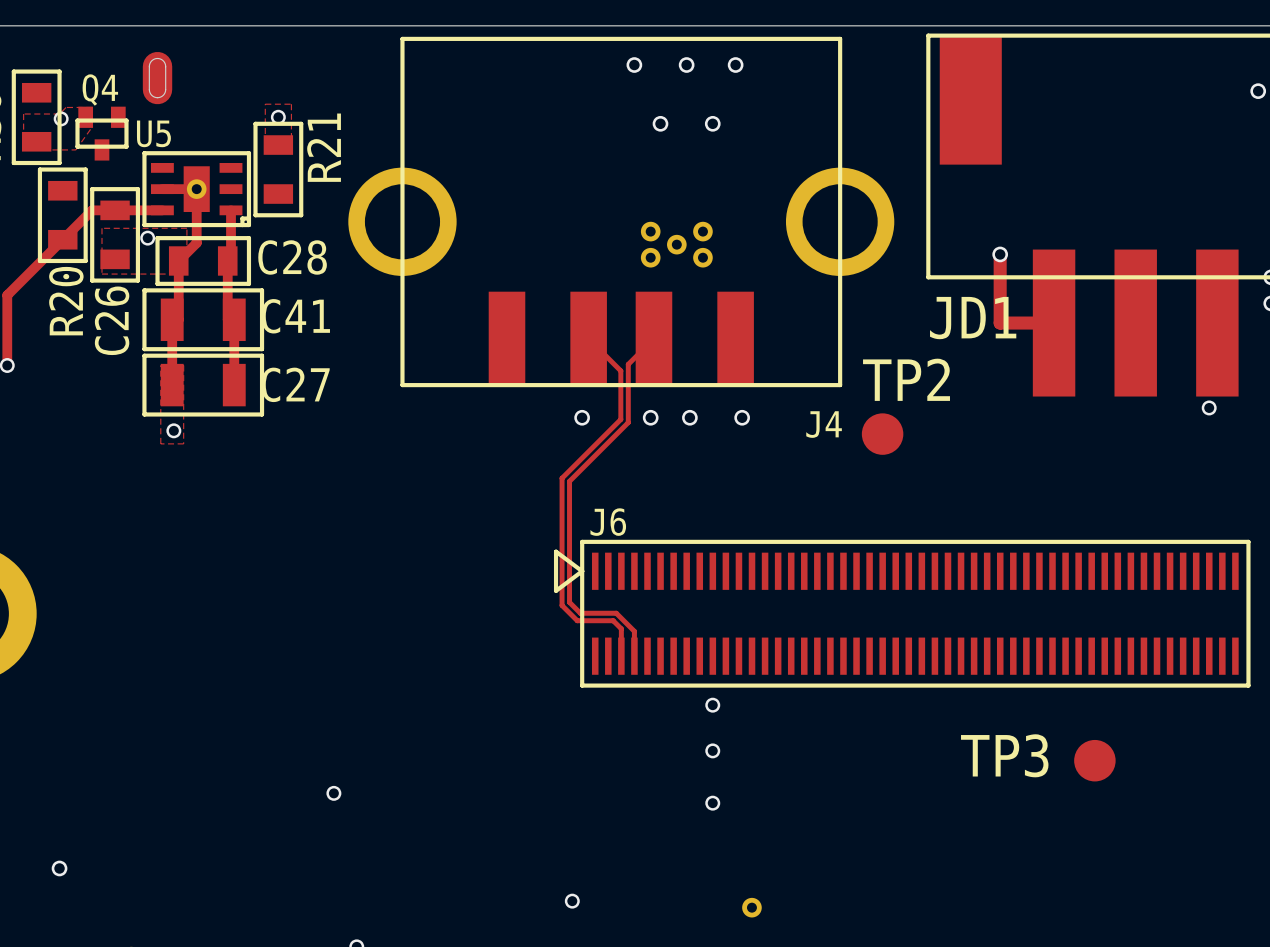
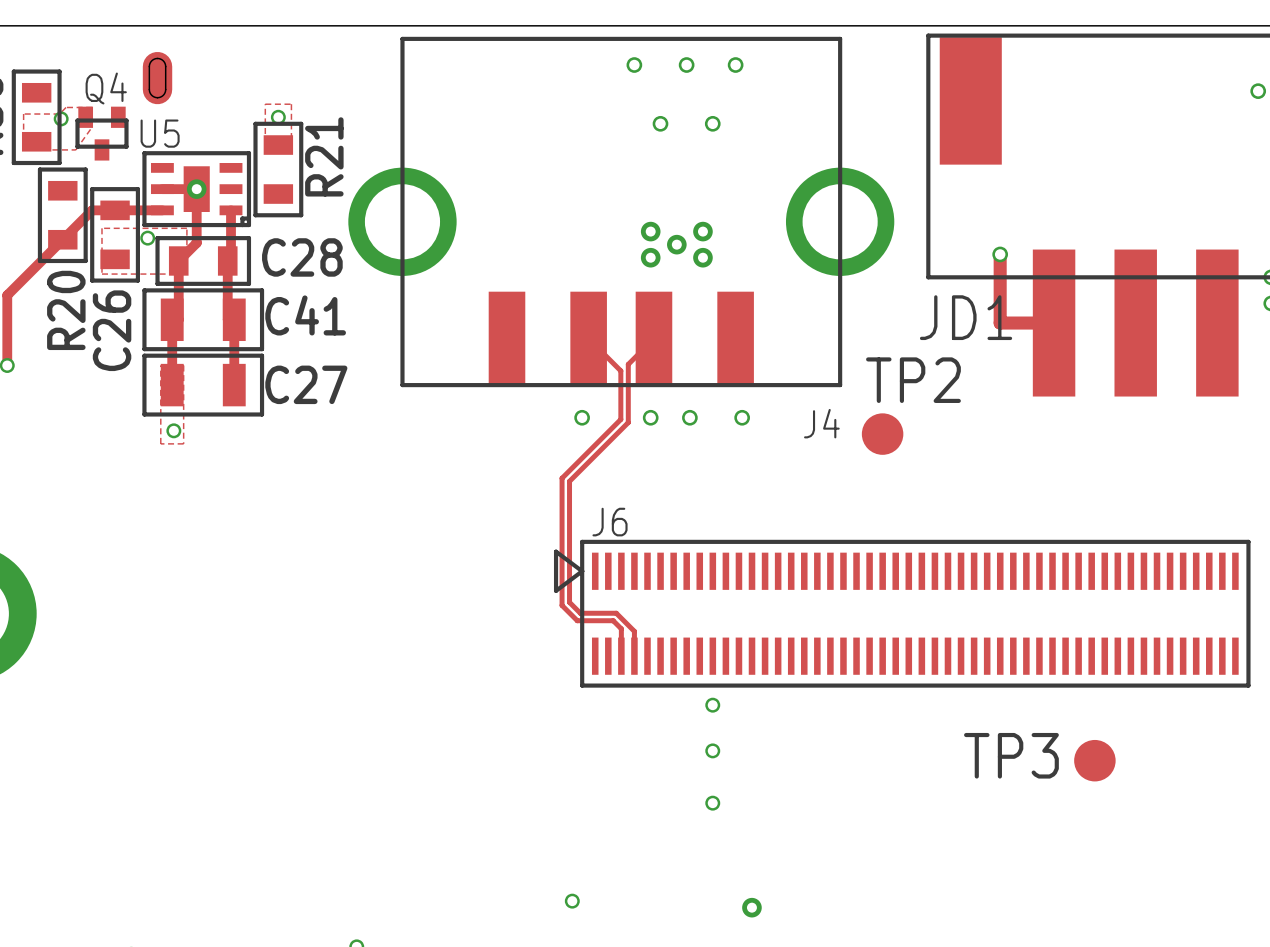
via: (1209, 407) -> none
via: (333, 793) -> none
via: (59, 868) -> none

